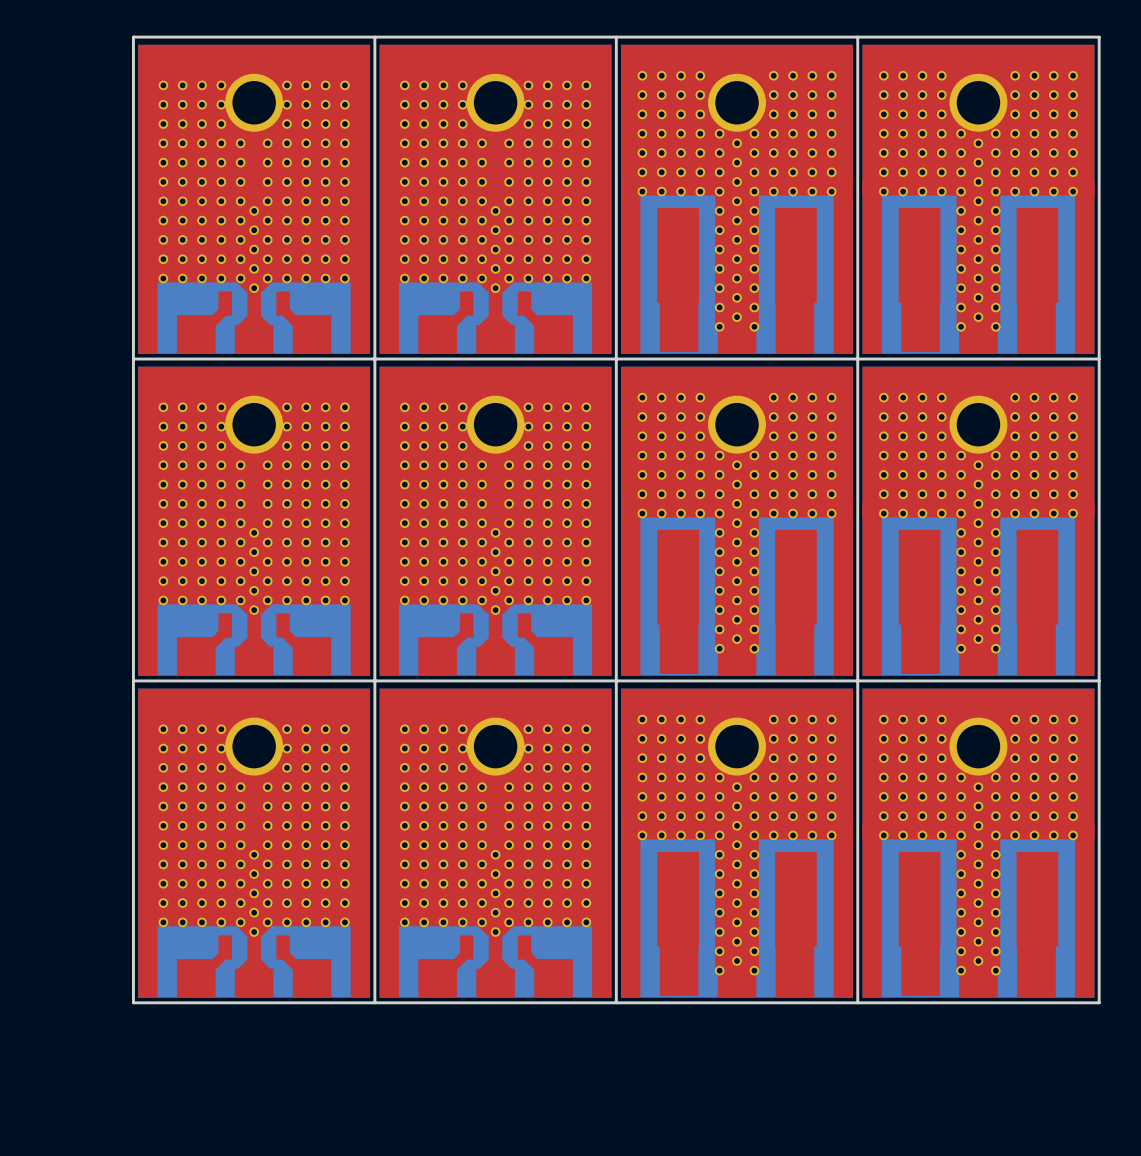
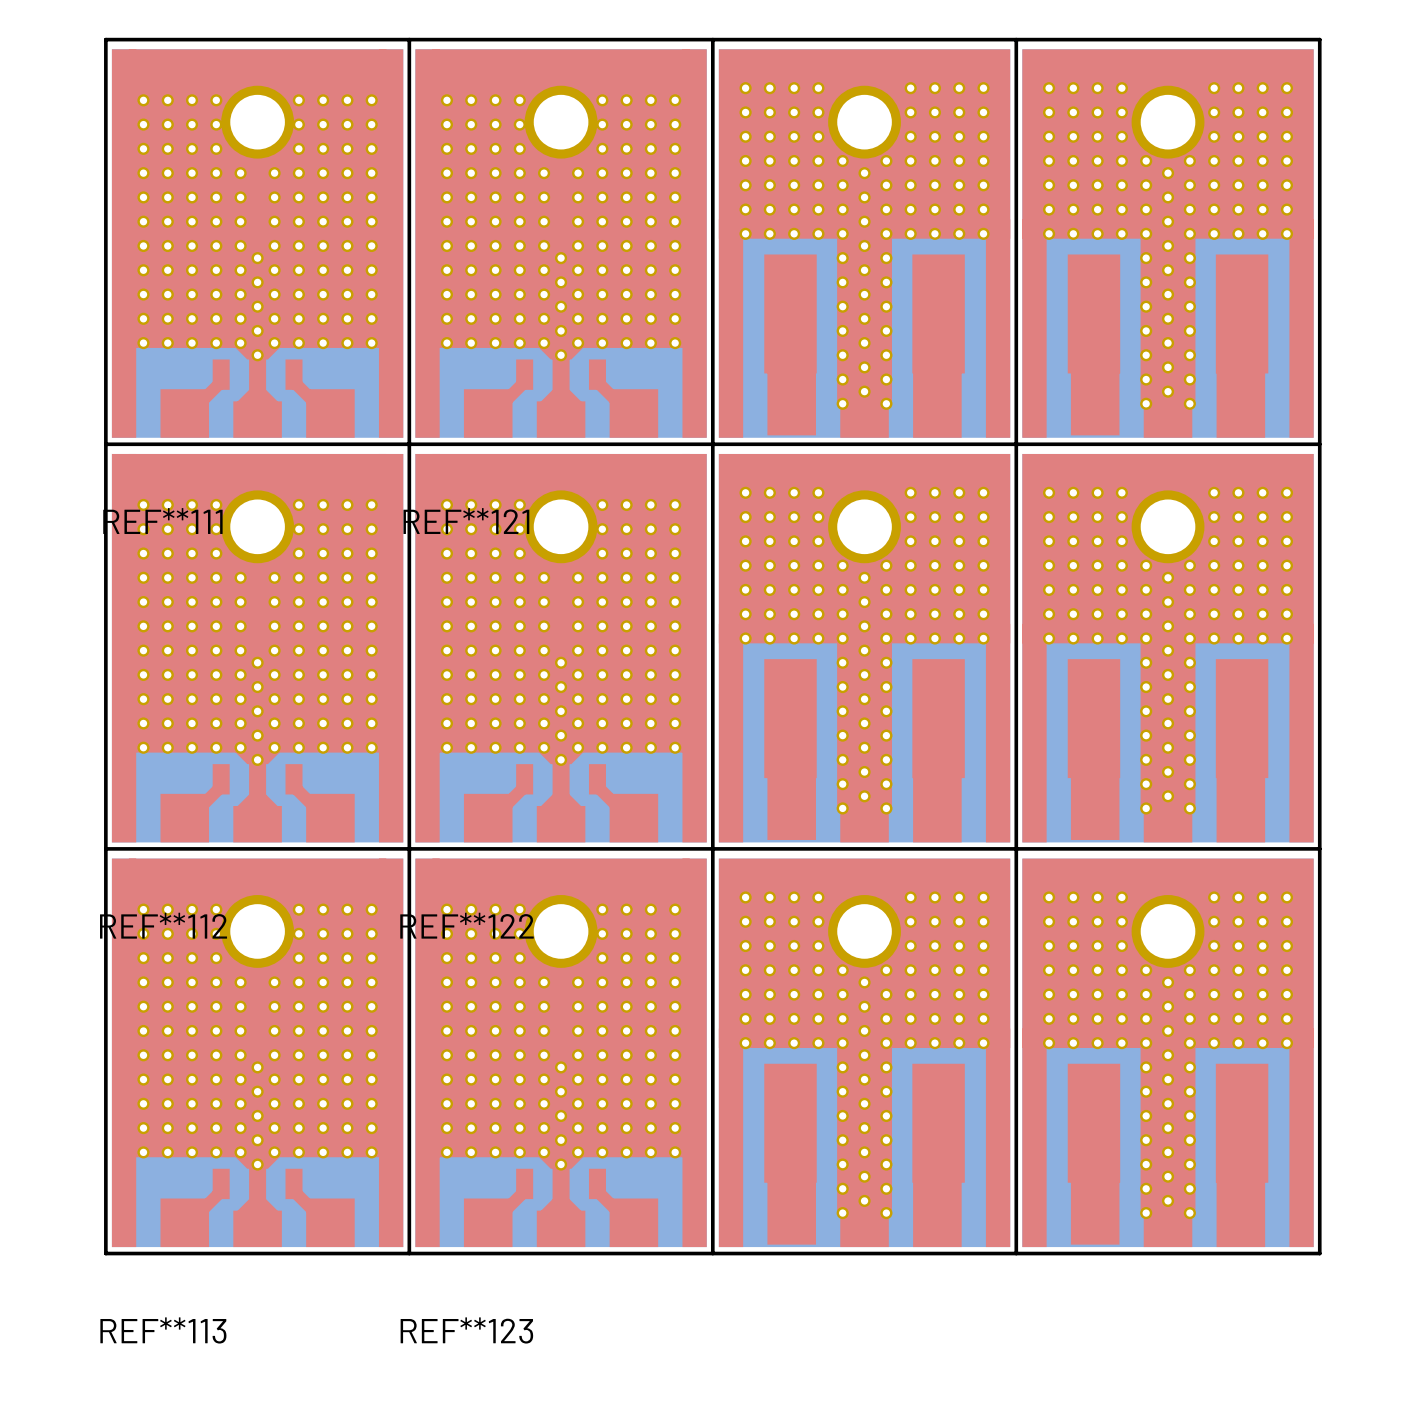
REF**111: none -> (257, 243)
REF**121: none -> (561, 243)
part: (254, 521) -> none
REF**112: none -> (257, 648)
part: (495, 521) -> none
REF**122: none -> (561, 648)
part: (254, 843) -> none
REF**113: none -> (257, 1052)
part: (495, 843) -> none
REF**123: none -> (561, 1052)

